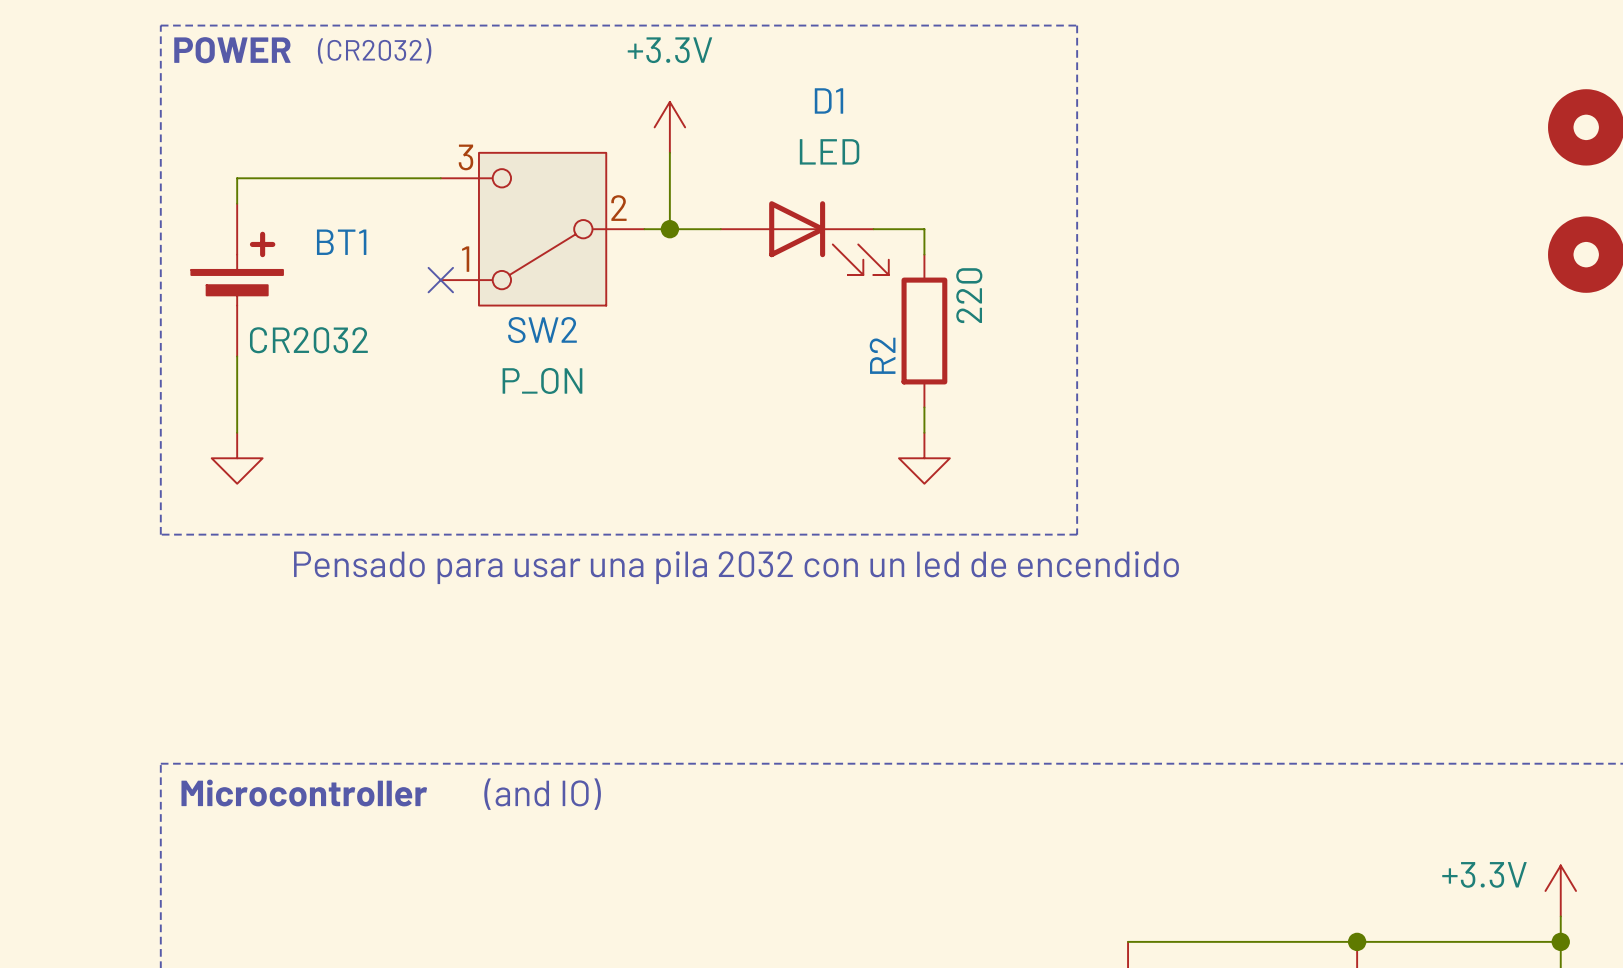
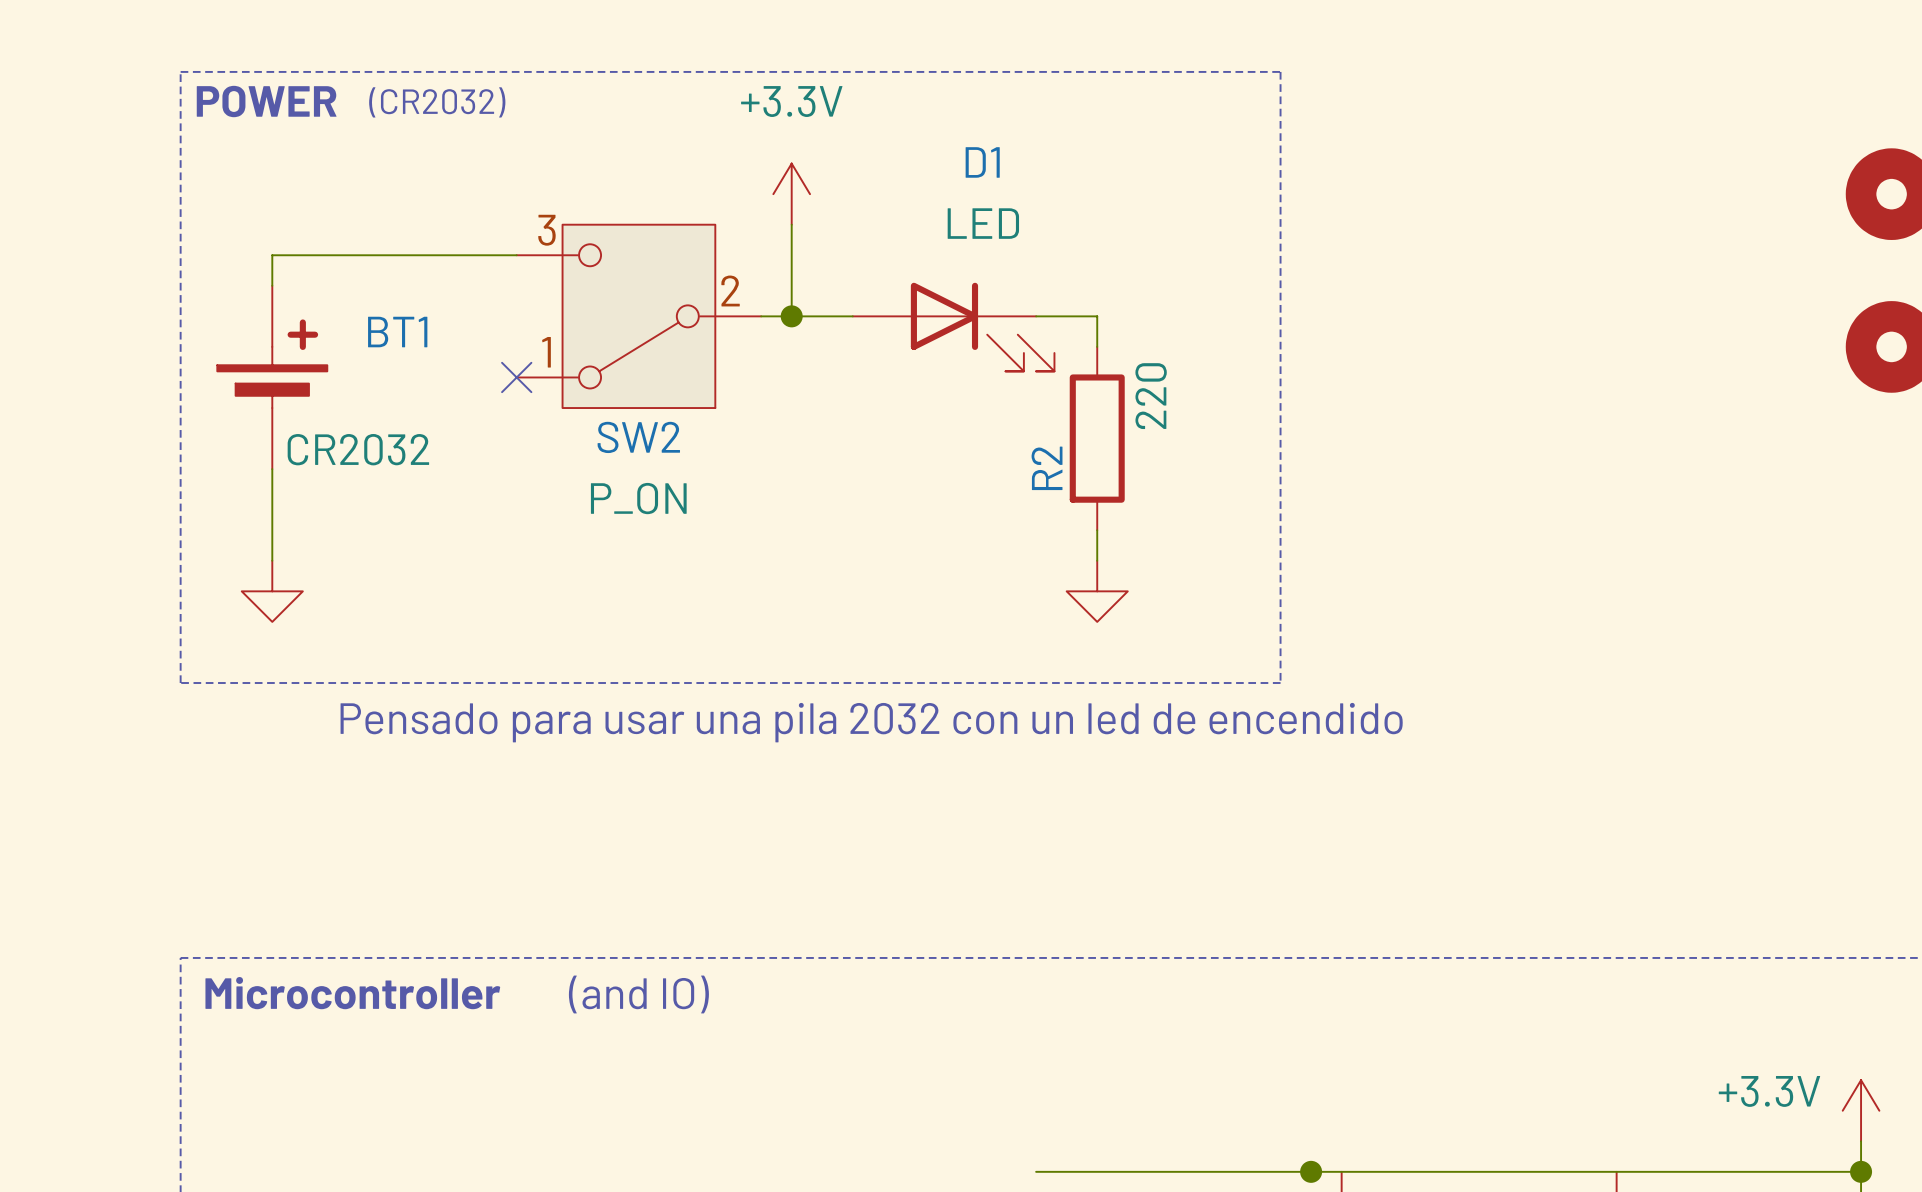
wire: none -> (1036, 1171) (1341, 1171)
junction: none -> (1311, 1171)
junction: (1357, 941) -> none

